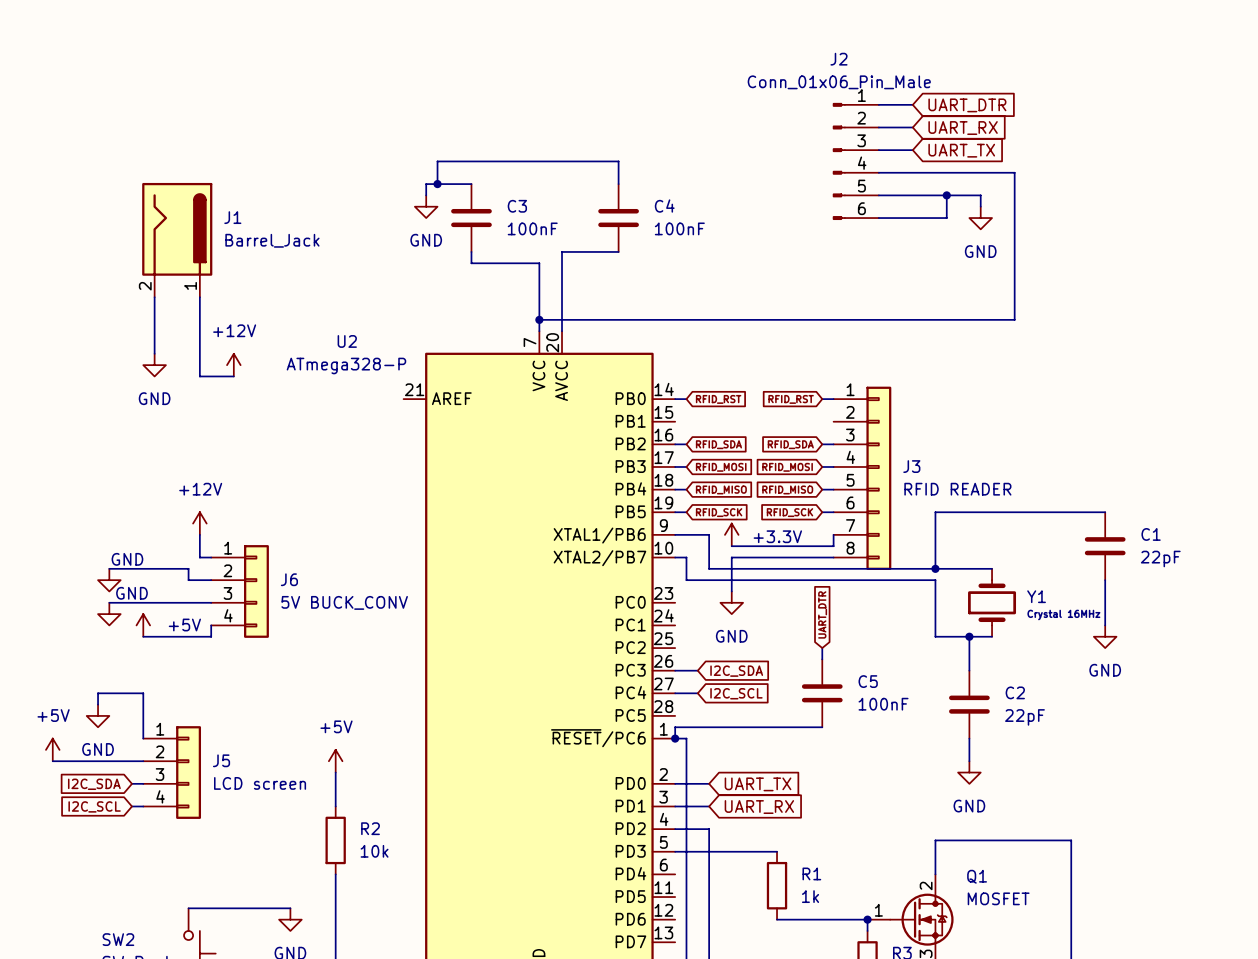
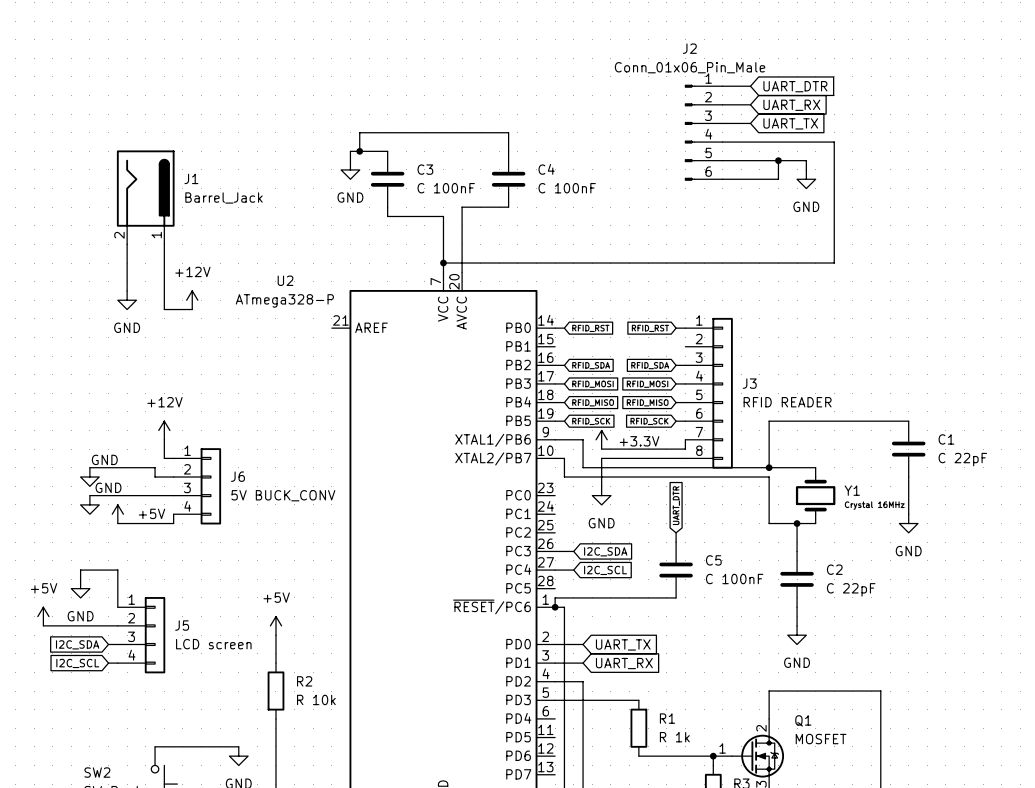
C3 value: 100nF (532, 228) -> C 100nF (446, 188)
C4 value: 100nF (679, 228) -> C 100nF (567, 188)
C1 value: 22pF (1160, 558) -> C 22pF (962, 459)
C5 value: 100nF (883, 704) -> C 100nF (734, 579)
C2 value: 22pF (1024, 717) -> C 22pF (851, 589)
R2 value: 10k (374, 851) -> R 10k (316, 699)
R1 value: 1k (810, 896) -> R 1k (674, 737)

